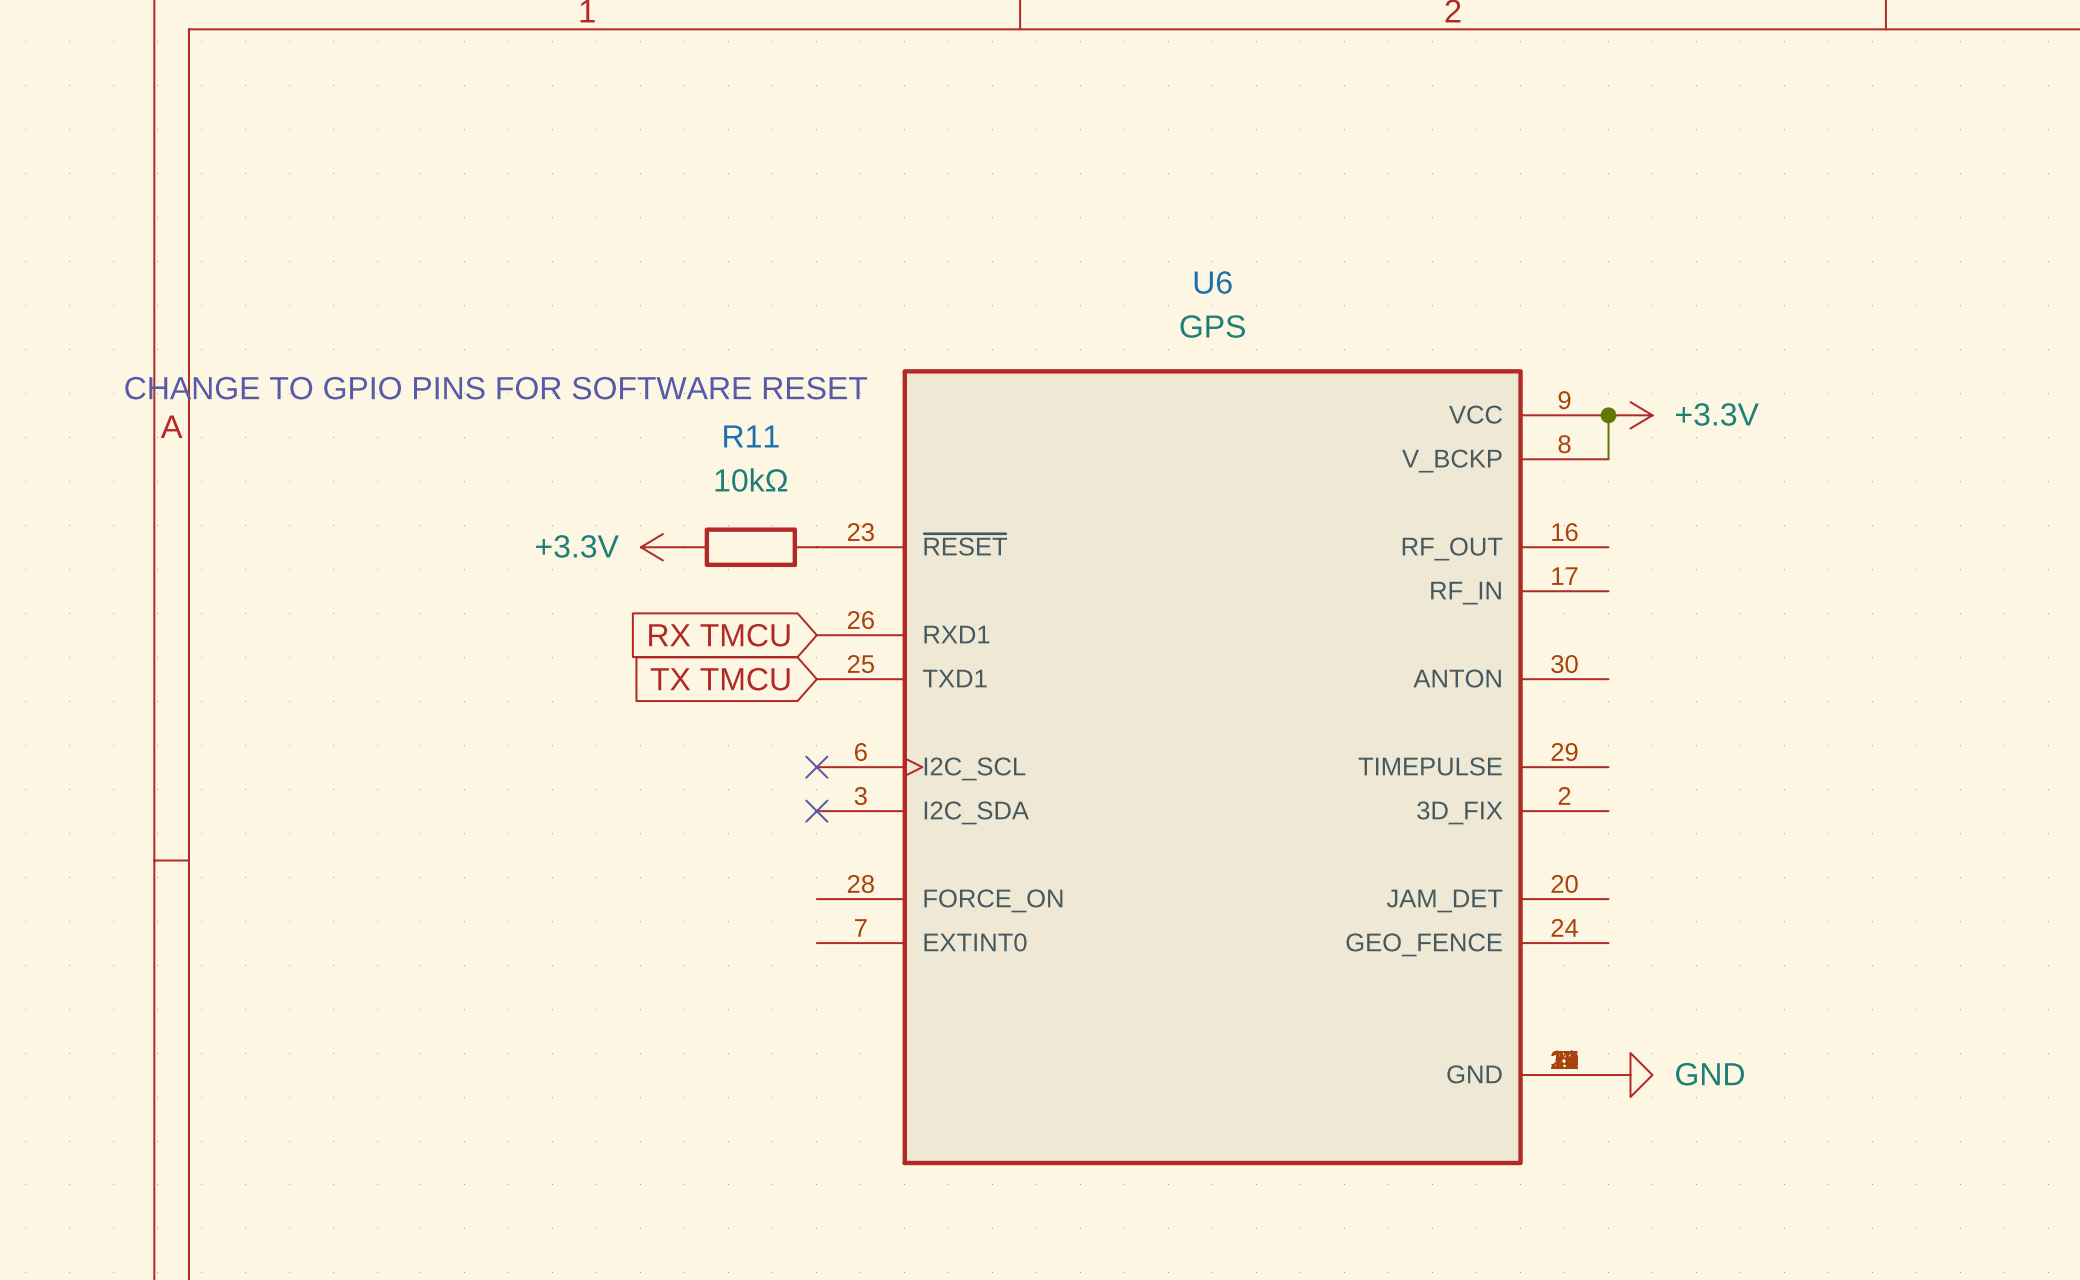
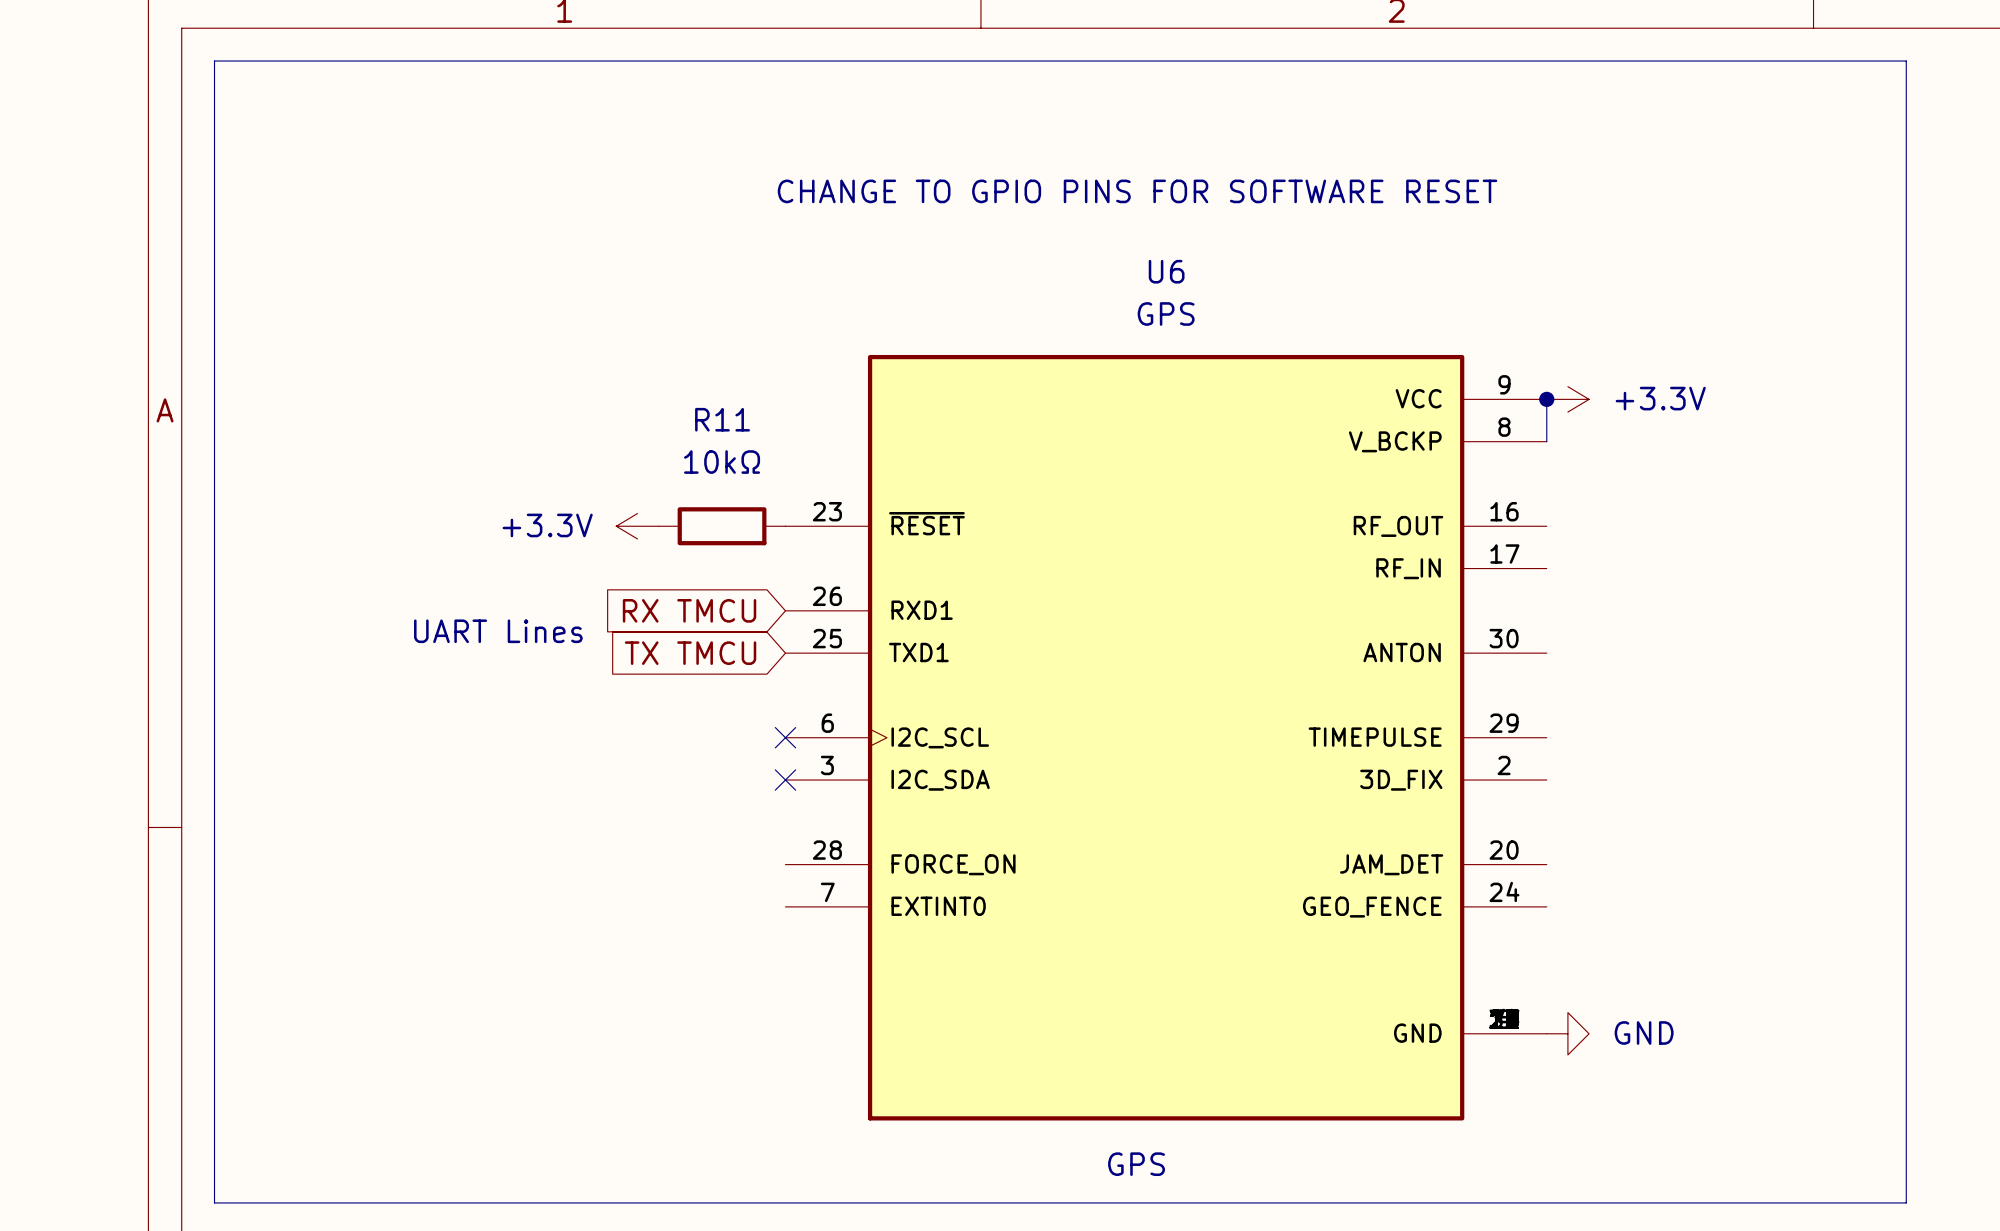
line: none -> (214, 61) (1906, 61) (1906, 1202) (214, 1202) (214, 61)
text: none -> CHANGE TO GPIO PINS FOR SOFTWARE RESET (1137, 191)
text: CHANGE TO GPIO PINS FOR SOFTWARE RESET (496, 388) -> none
text: none -> UART Lines (498, 631)
text: none -> GPS (1136, 1164)

